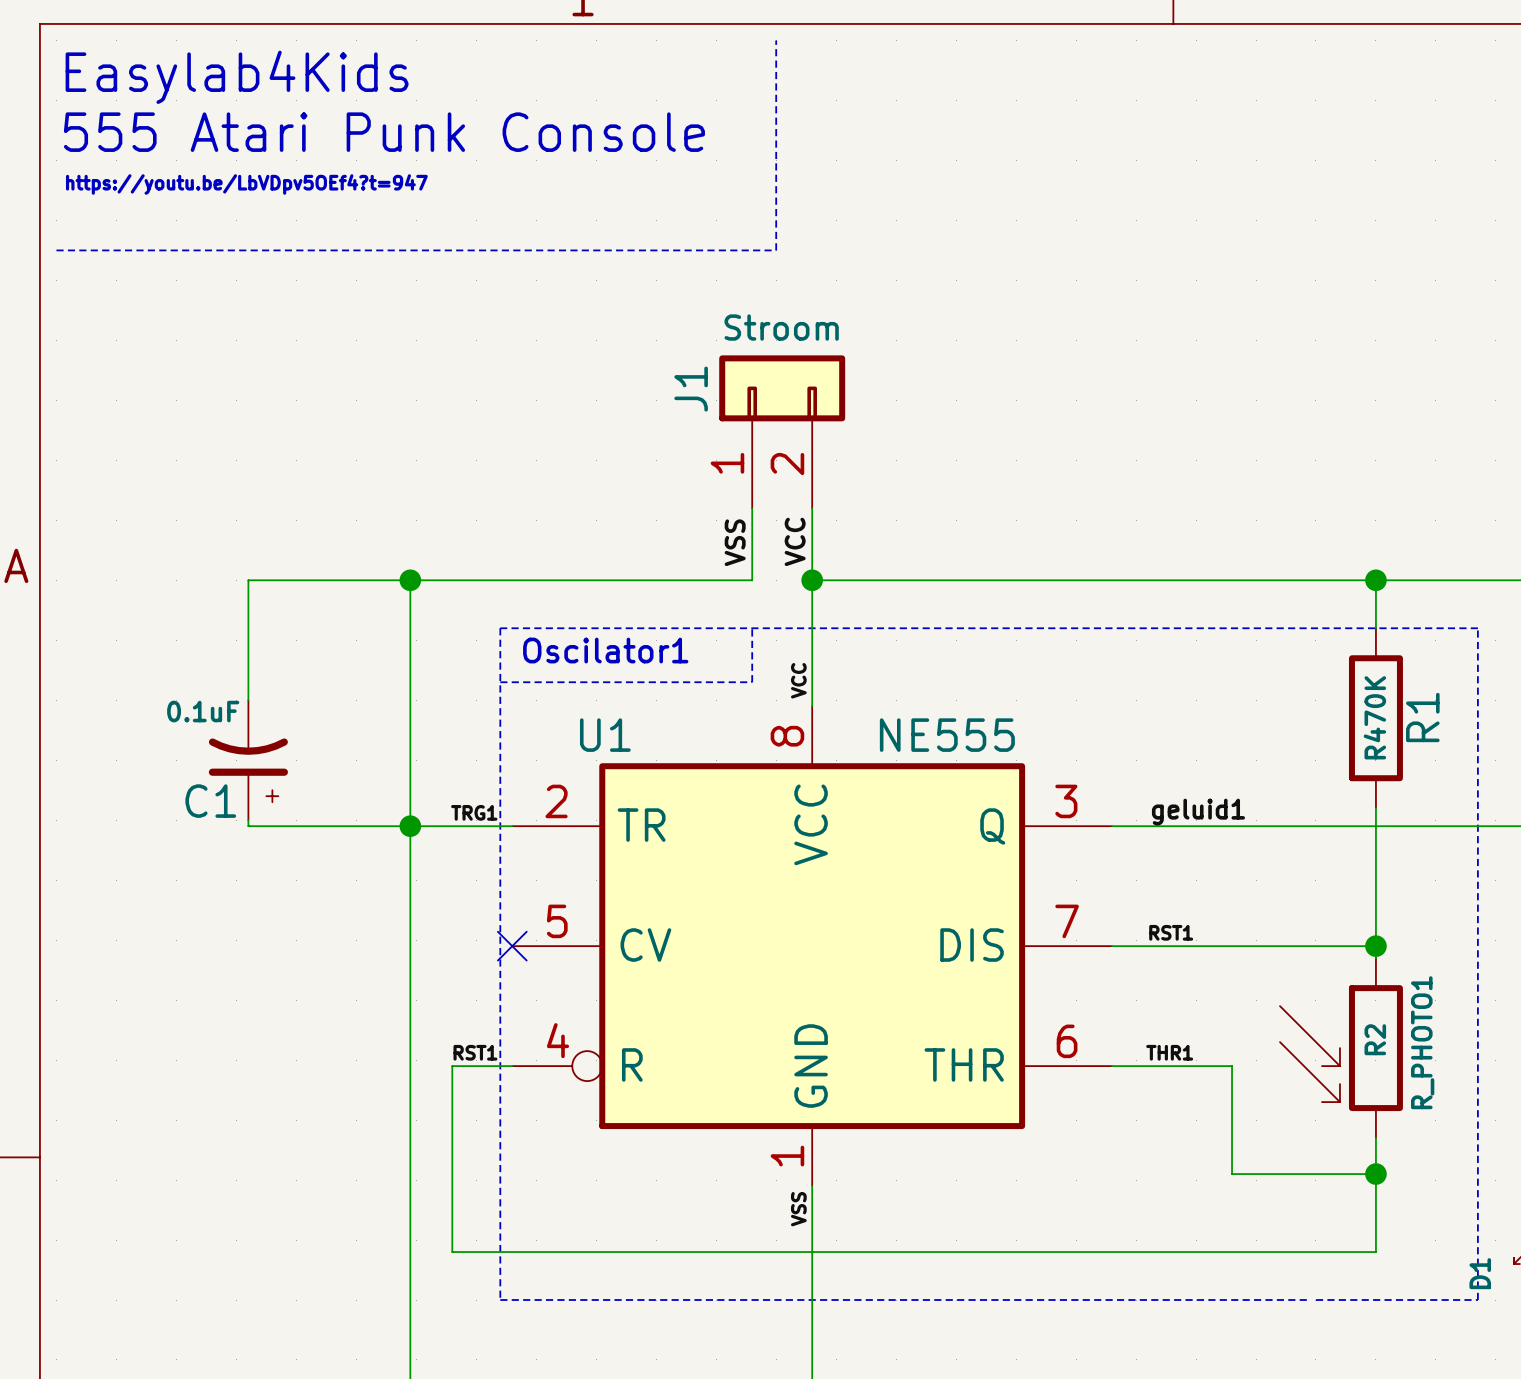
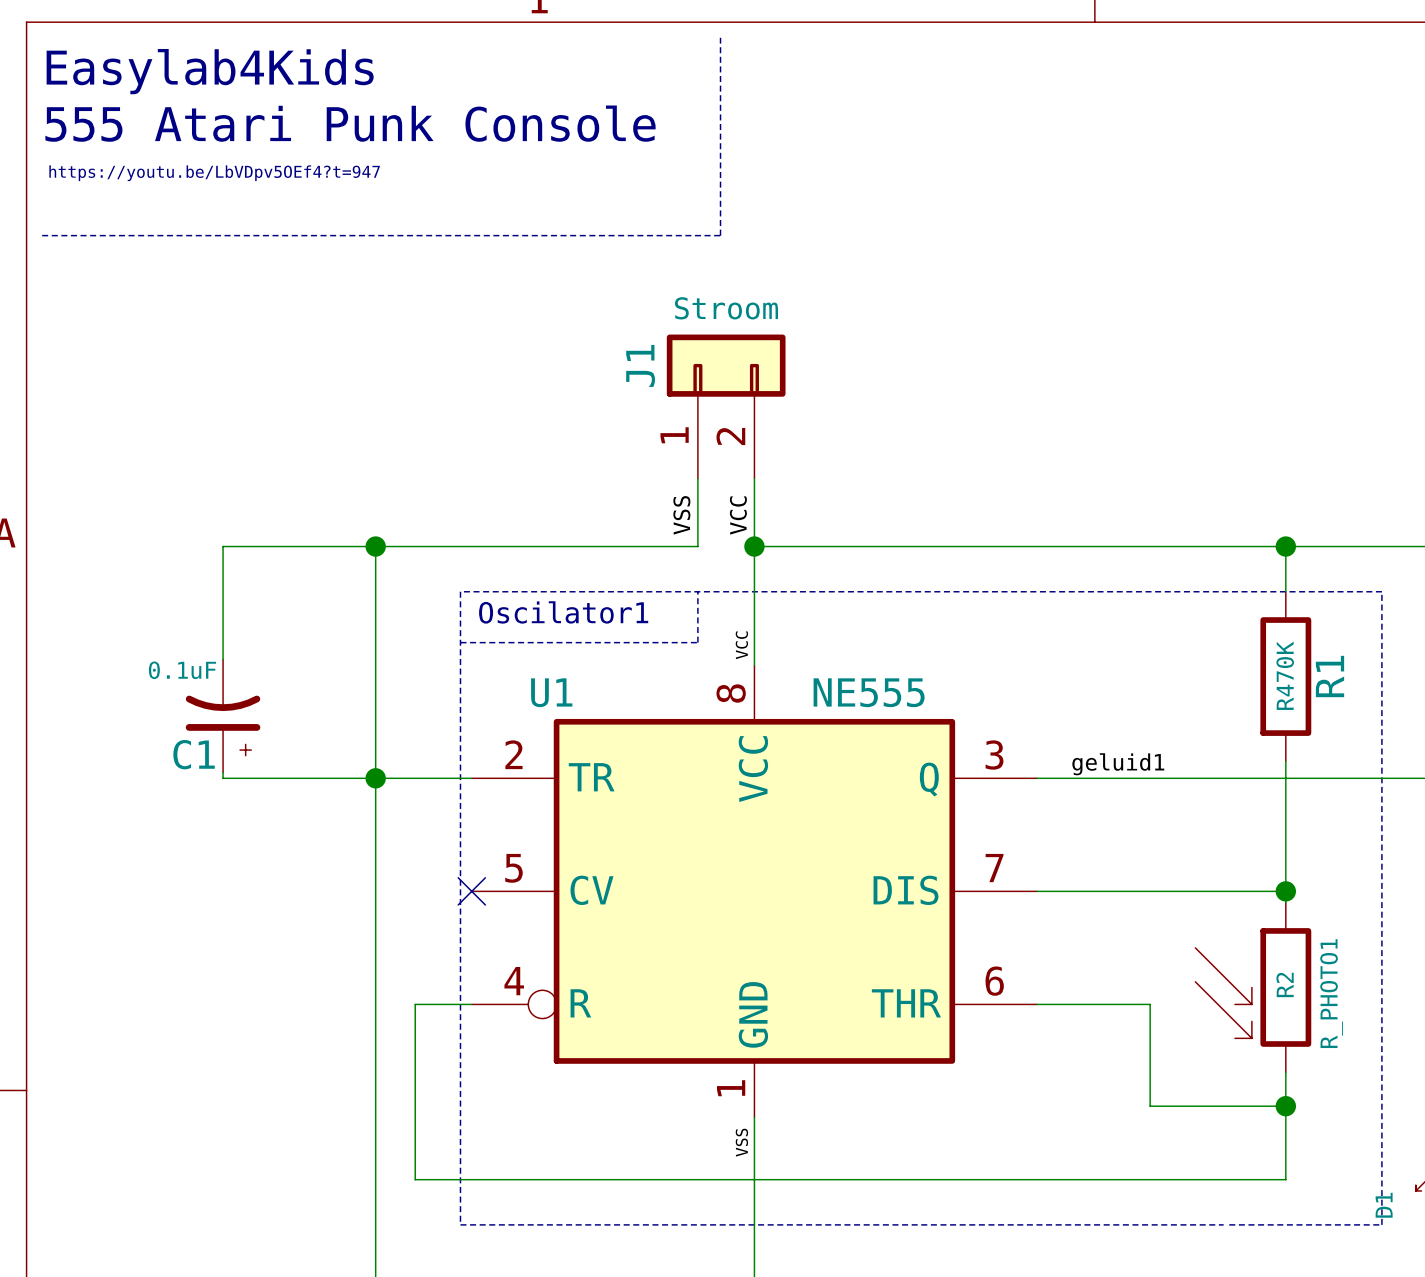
label: TRG1 (474, 812) -> none
label: RST1 (1171, 932) -> none
label: RST1 (475, 1052) -> none
label: THR1 (1169, 1052) -> none

